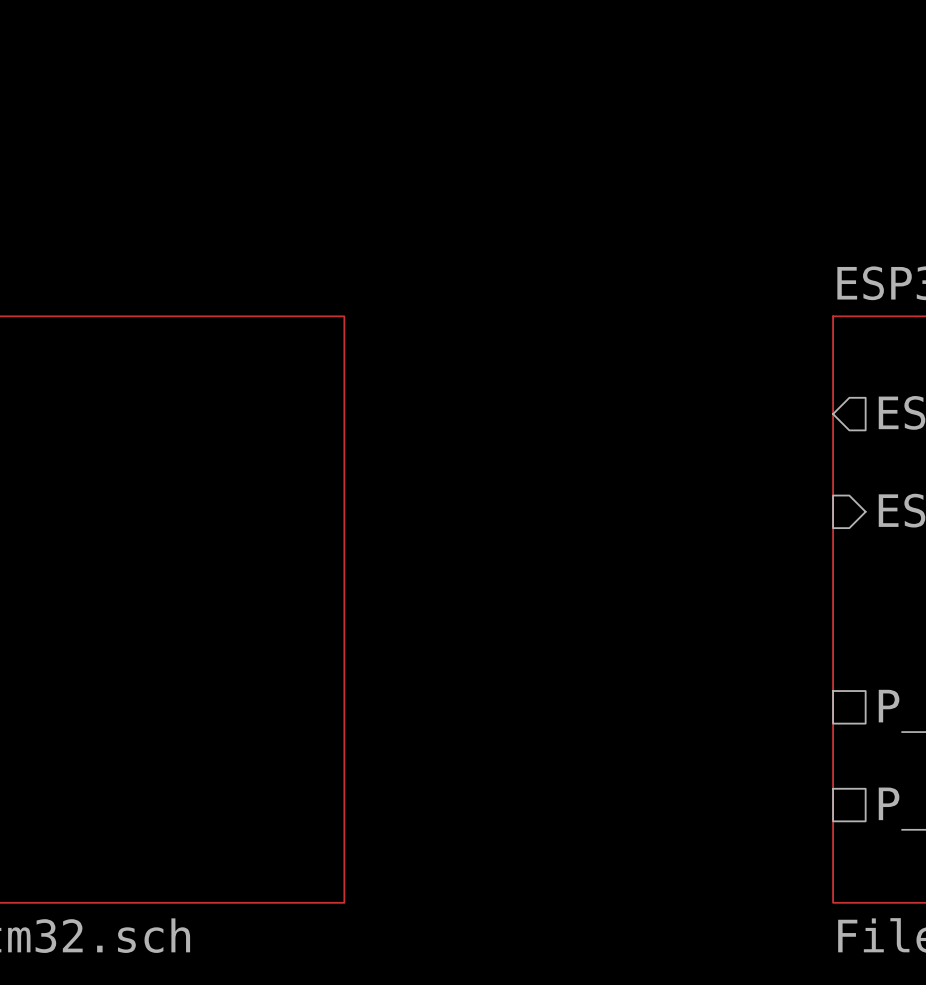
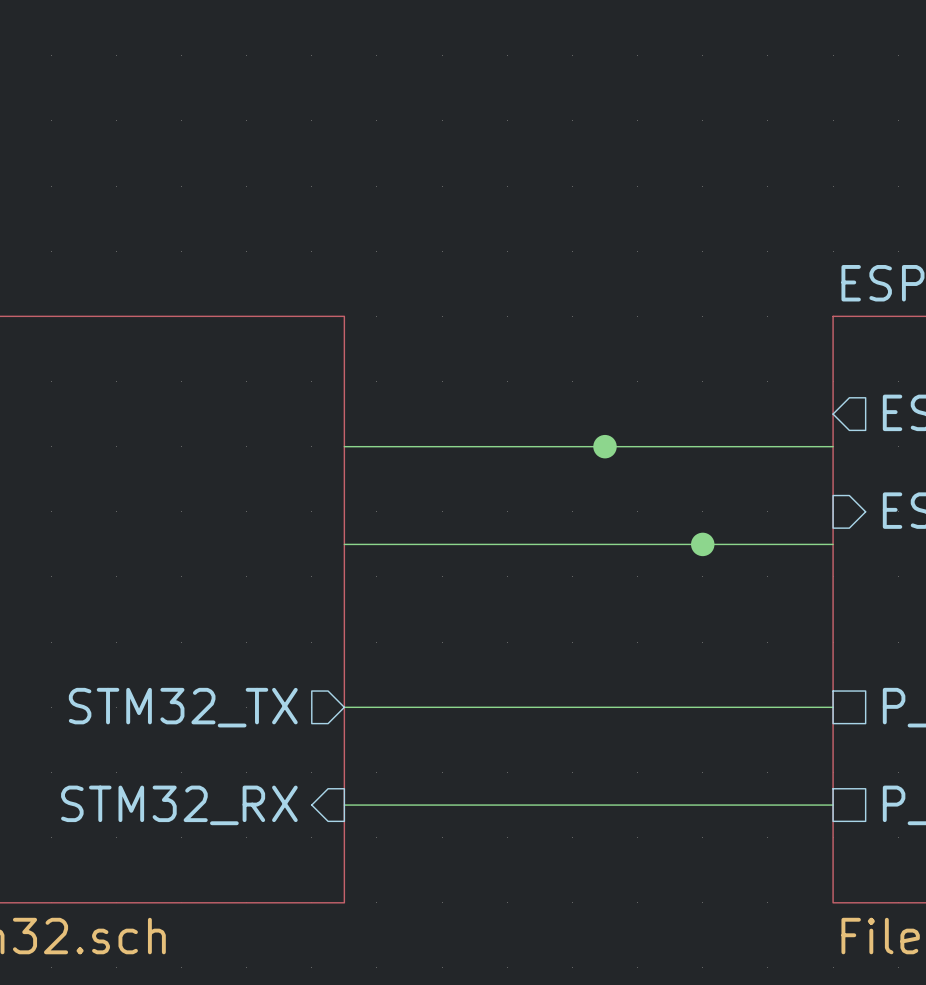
wire: none -> (344, 446) (833, 446)
junction: none -> (605, 446)
wire: none -> (344, 544) (833, 544)
junction: none -> (702, 544)
wire: none -> (344, 707) (833, 707)
sheet pin: none -> STM32_TX (183, 707)
wire: none -> (344, 805) (833, 805)
sheet pin: none -> STM32_RX (179, 805)

